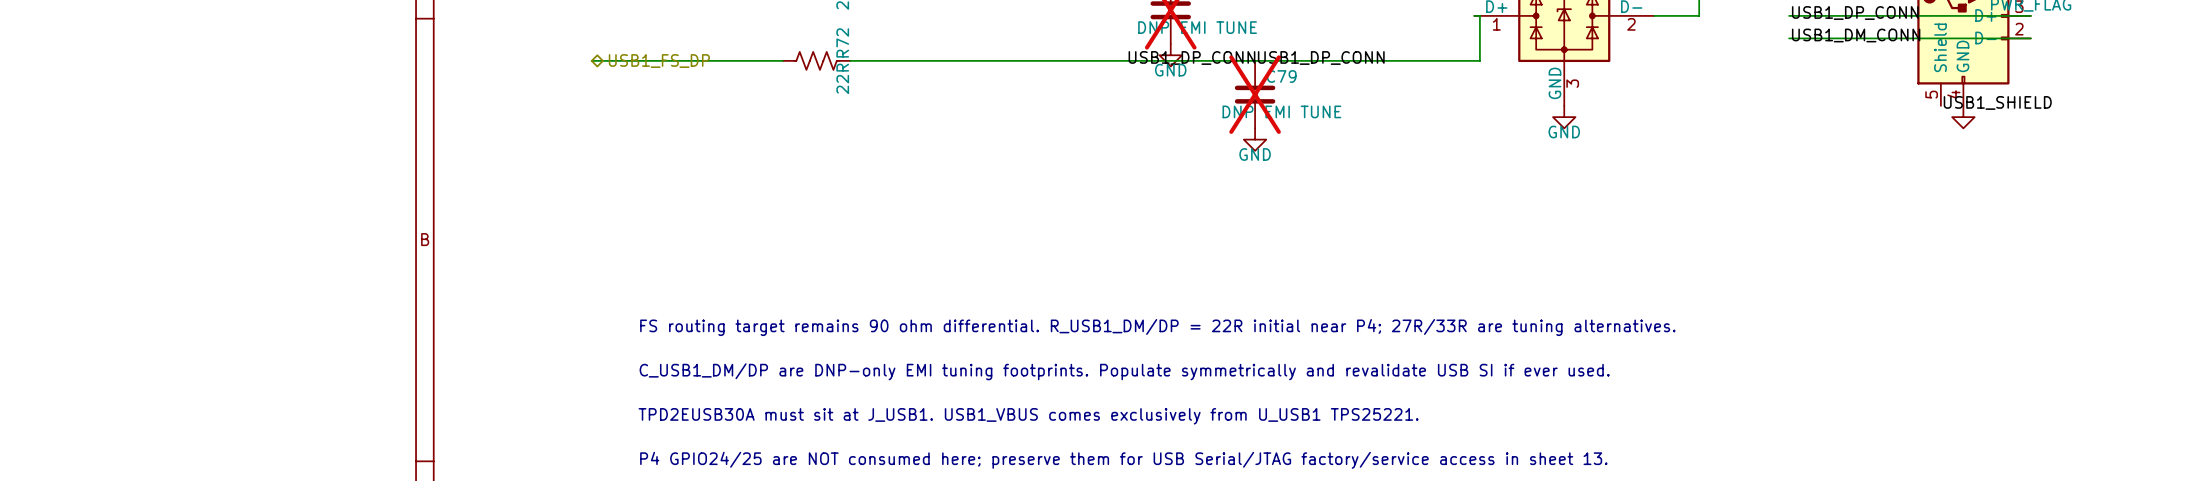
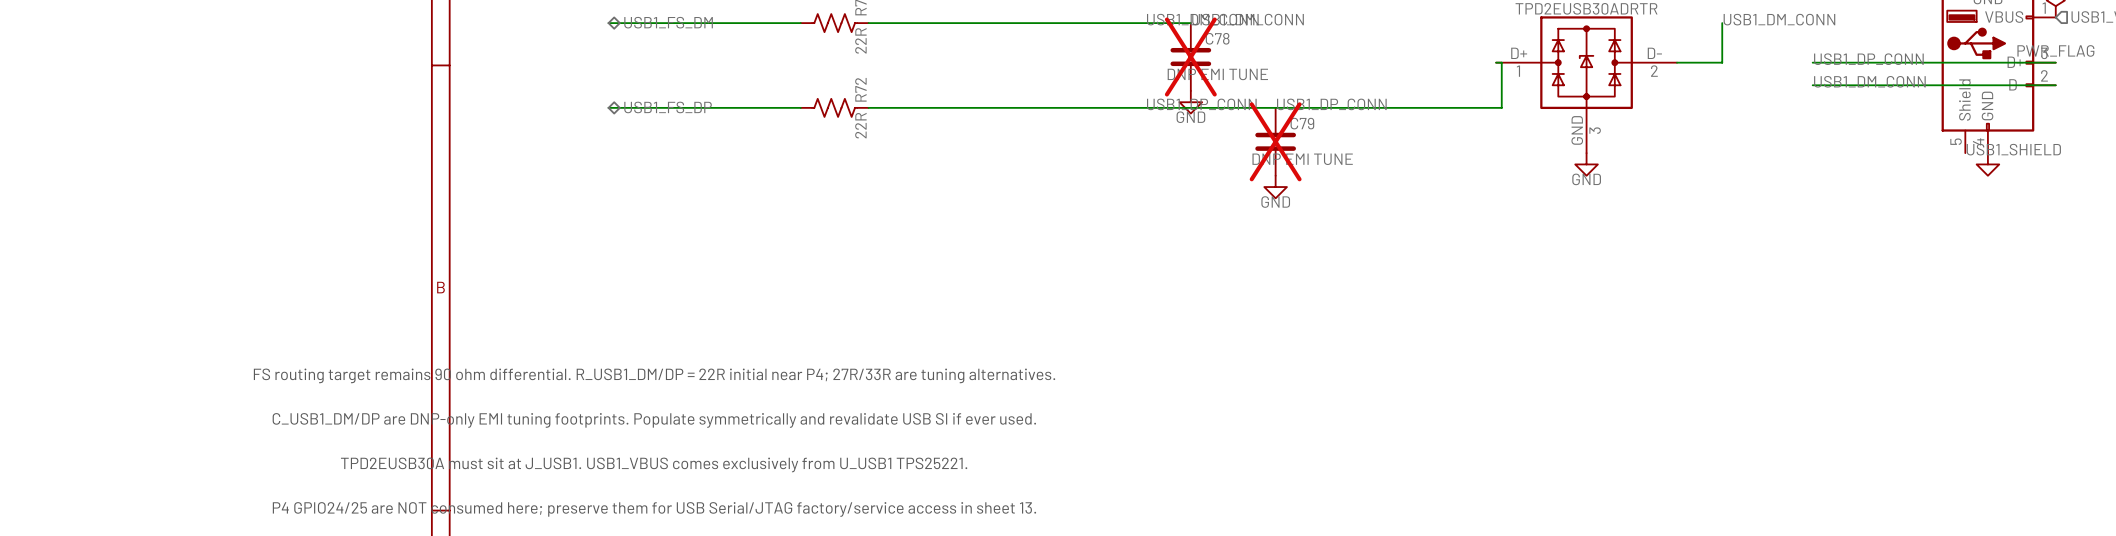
text position: FS routing target remains 90 ohm differential. R_USB1_DM/DP = 22R initial near P4; 27R/33R are tuning alternatives. (1157, 327) -> FS routing target remains 90 ohm differential. R_USB1_DM/DP = 22R initial near P4; 27R/33R are tuning alternatives. (654, 375)
text position: C_USB1_DM/DP are DNP-only EMI tuning footprints. Populate symmetrically and revalidate USB SI if ever used. (1124, 371) -> C_USB1_DM/DP are DNP-only EMI tuning footprints. Populate symmetrically and revalidate USB SI if ever used. (654, 420)
text position: TPD2EUSB30A must sit at J_USB1. USB1_VBUS comes exclusively from U_USB1 TPS25221. (1028, 416) -> TPD2EUSB30A must sit at J_USB1. USB1_VBUS comes exclusively from U_USB1 TPS25221. (654, 464)
text position: P4 GPIO24/25 are NOT consumed here; preserve them for USB Serial/JTAG factory/service access in sheet 13. (1123, 460) -> P4 GPIO24/25 are NOT consumed here; preserve them for USB Serial/JTAG factory/service access in sheet 13. (654, 509)

